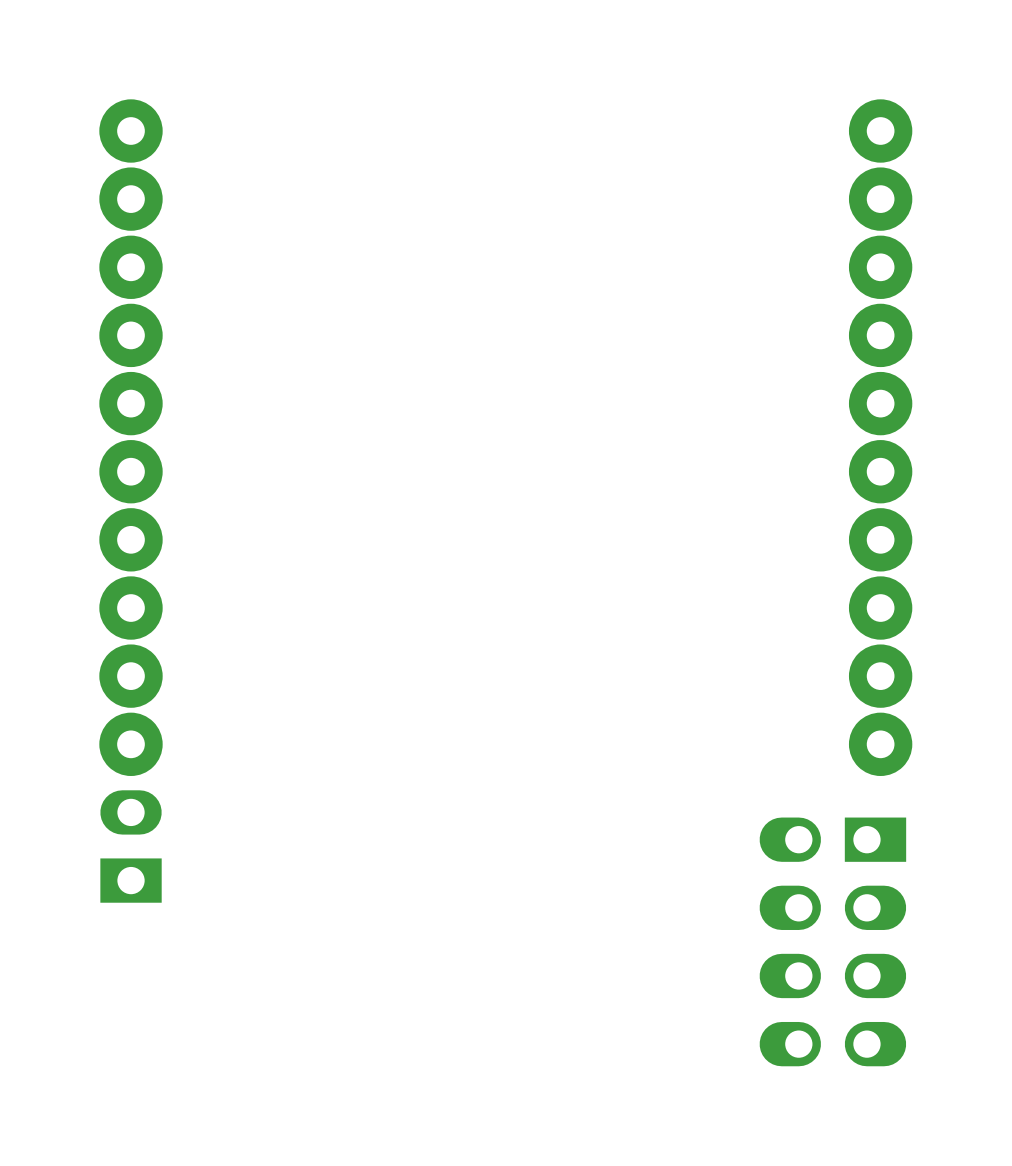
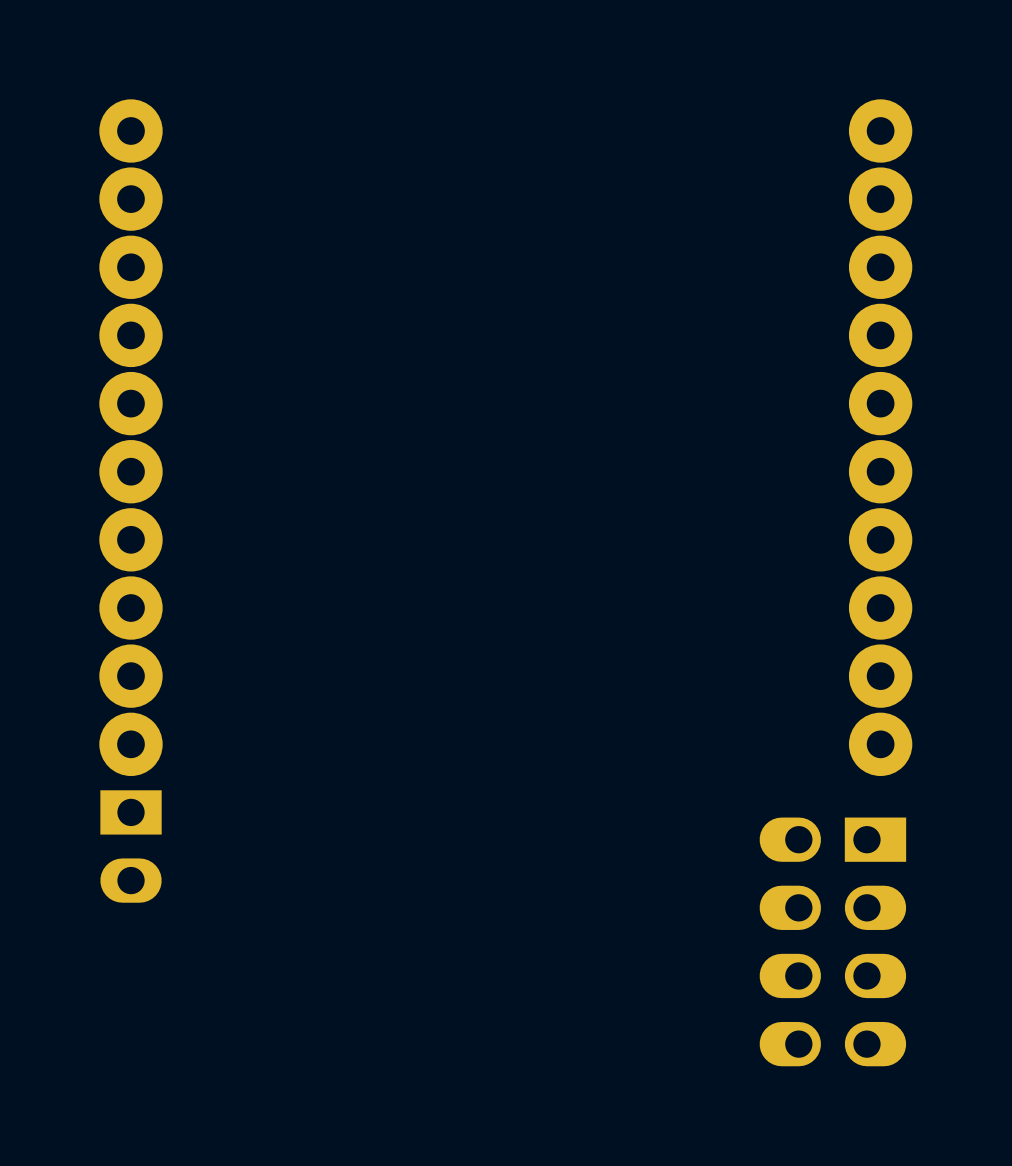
part rotation: 0° (131, 846) -> 180° (131, 846)

